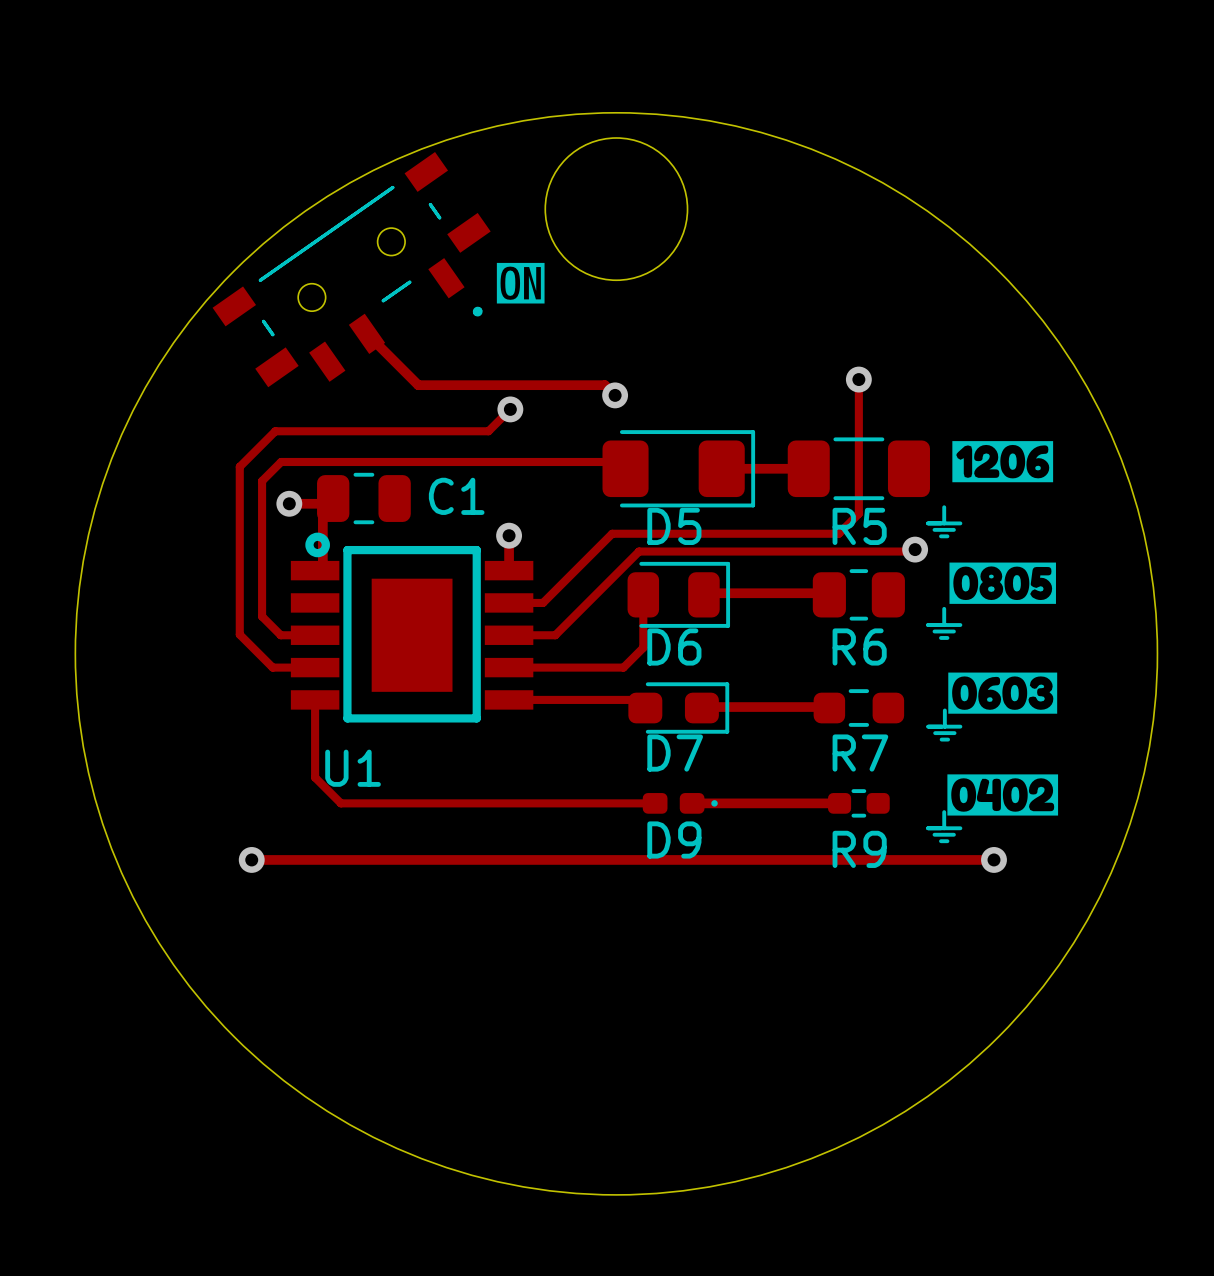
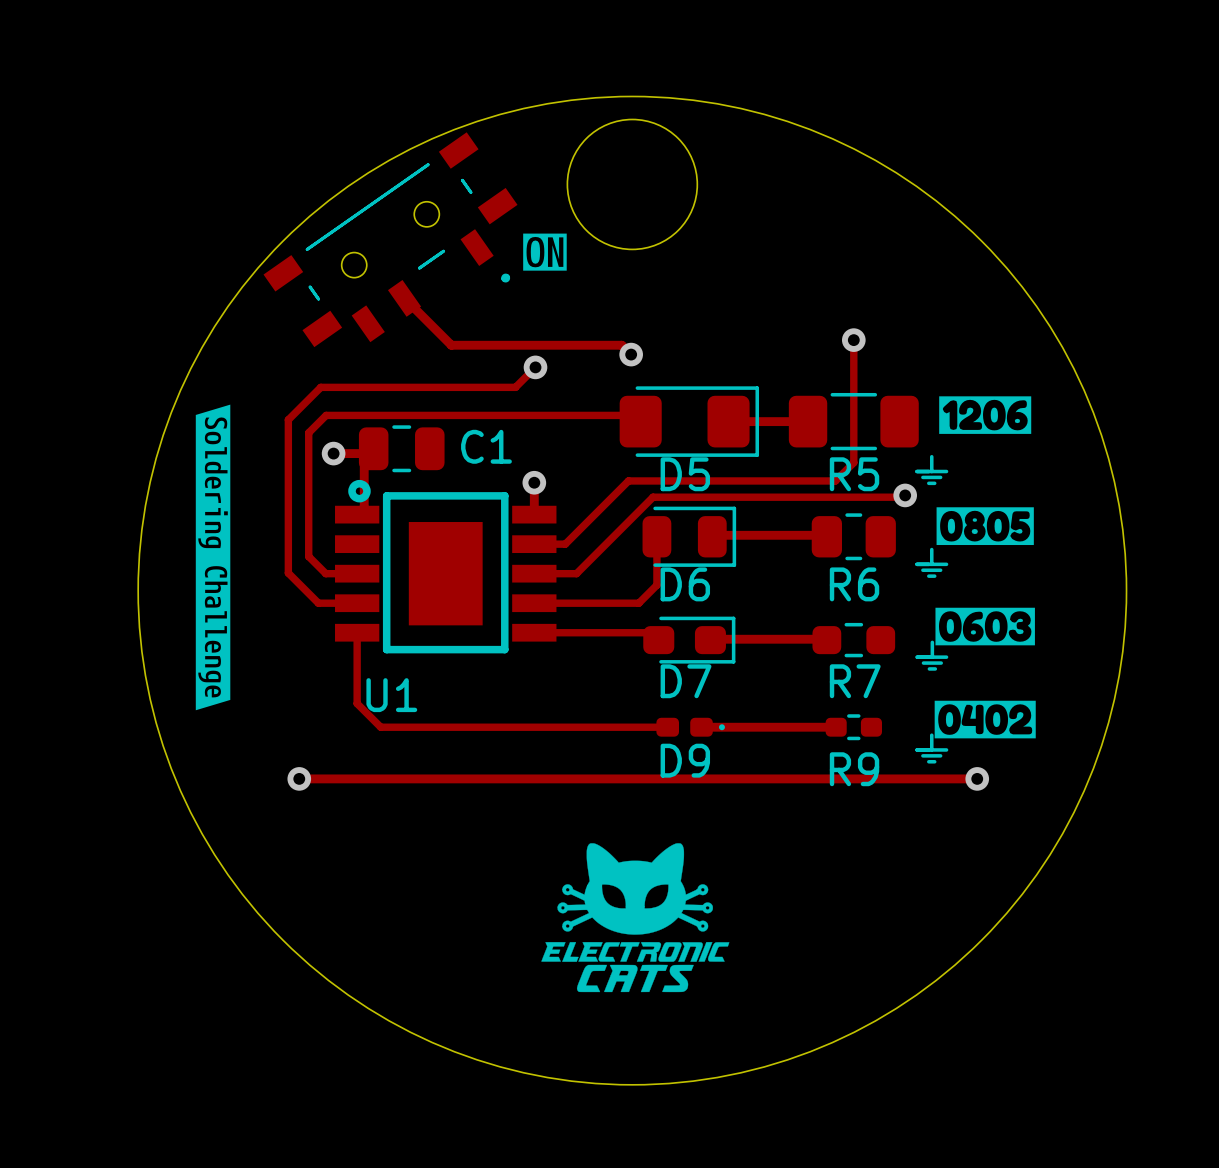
drawing: none -> [195, 404, 231, 711]
drawing: none -> [541, 843, 730, 993]

